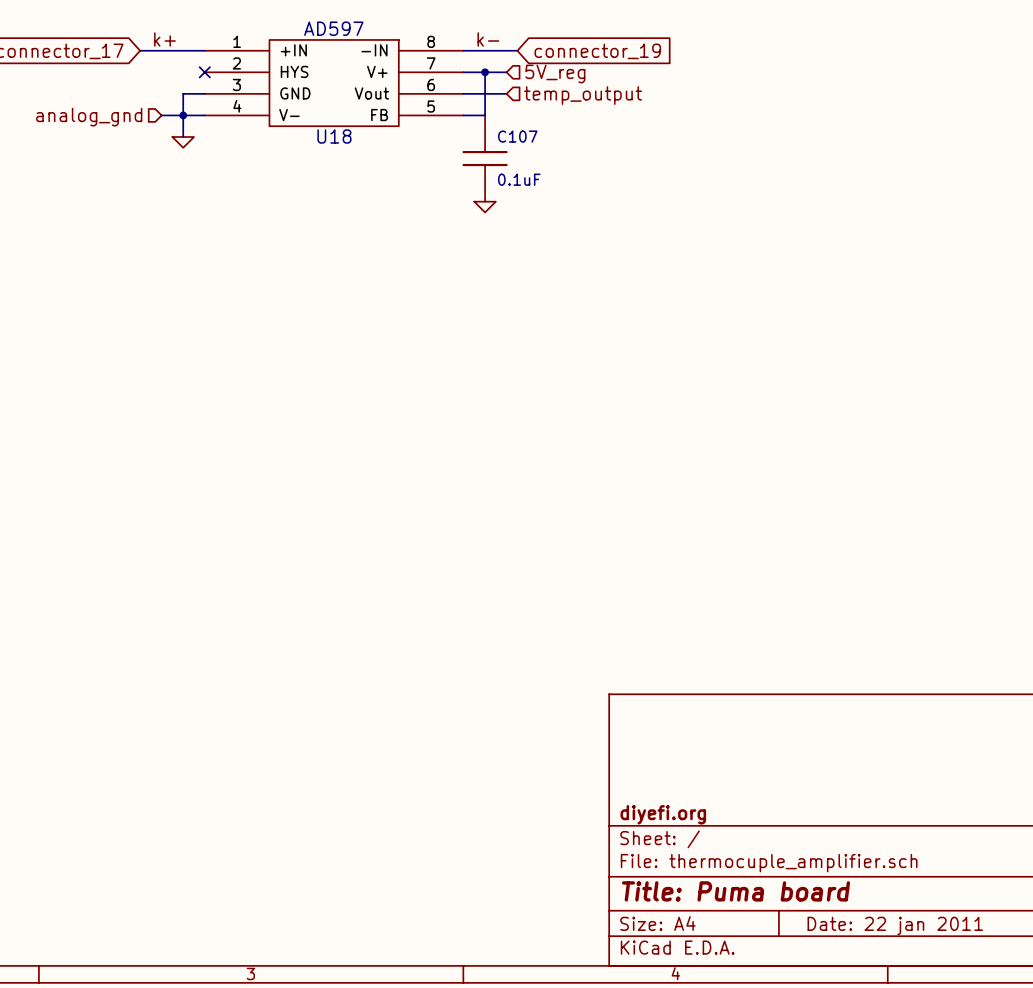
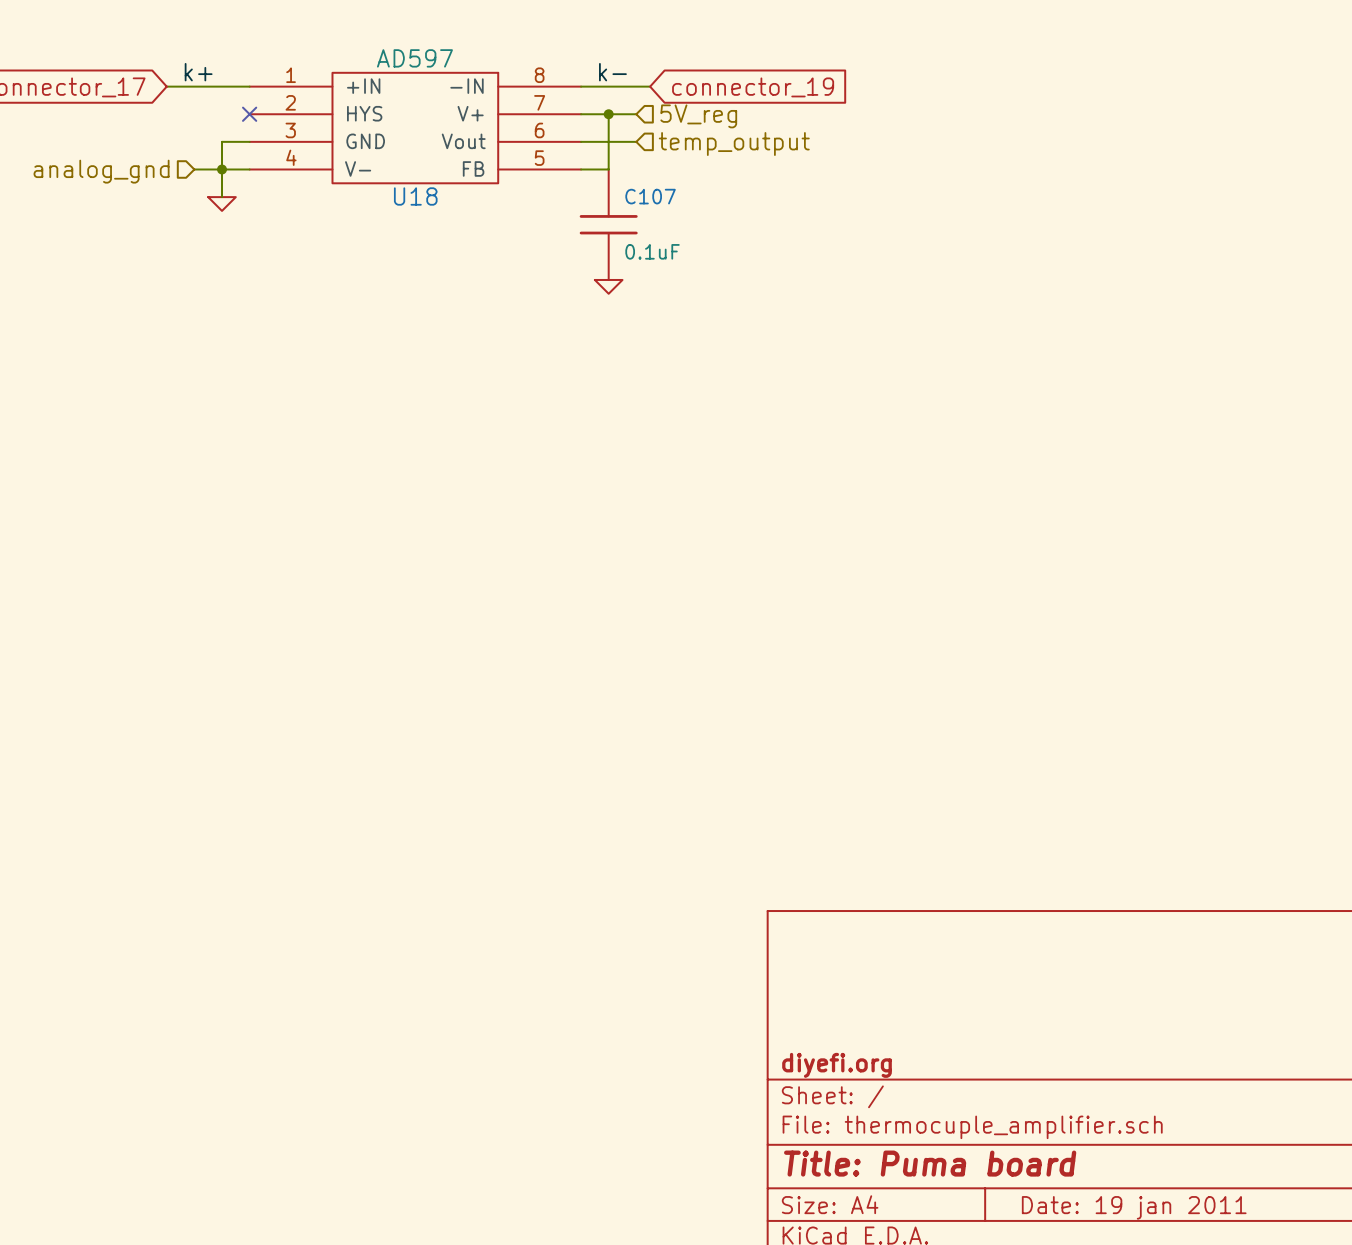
title block: Date: 22 jan 2011 (895, 925) -> Date: 19 jan 2011 (1134, 1207)

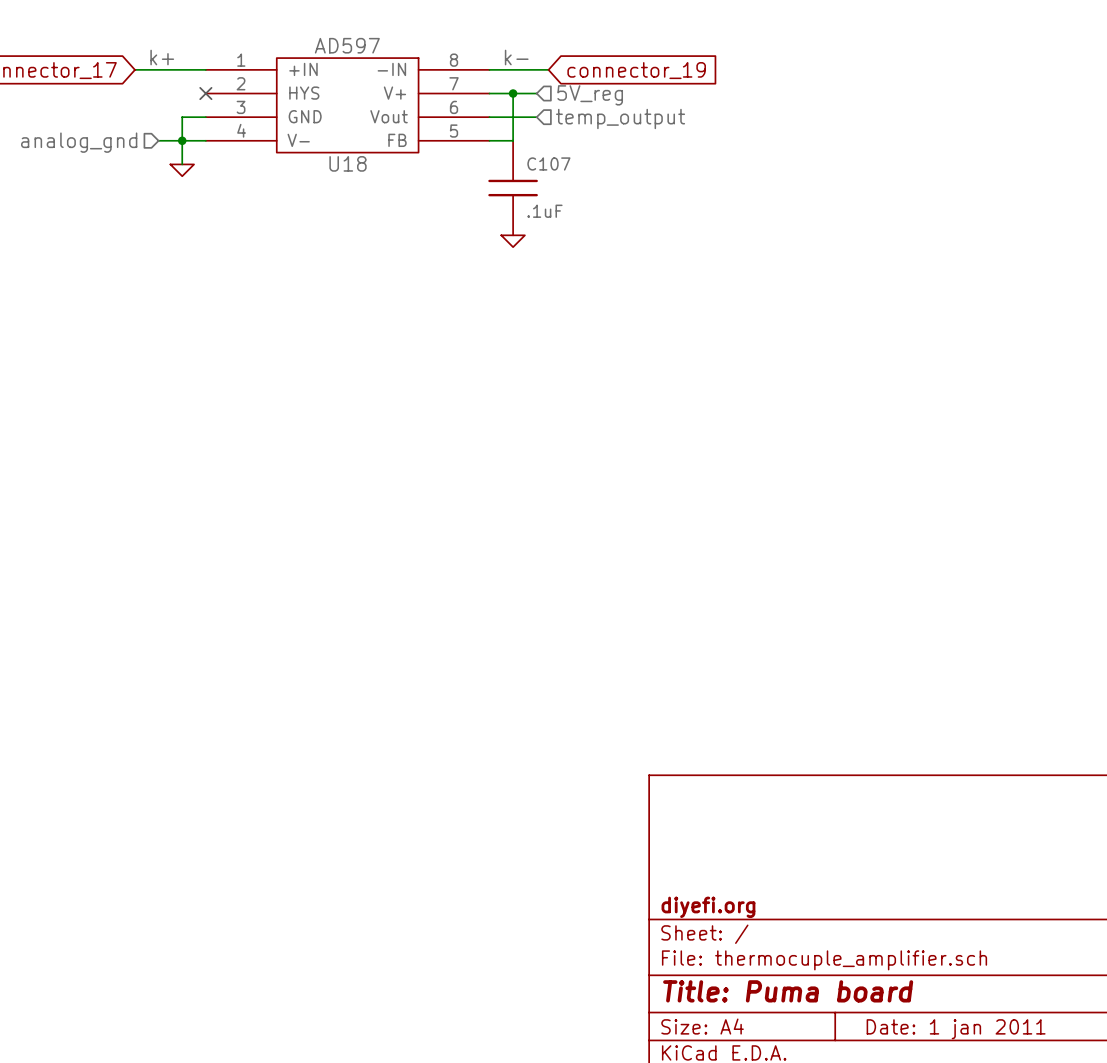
C107 value: 0.1uF (652, 251) -> .1uF (544, 211)
title block: Date: 19 jan 2011 (1134, 1207) -> Date: 1 jan 2011 (956, 1029)

